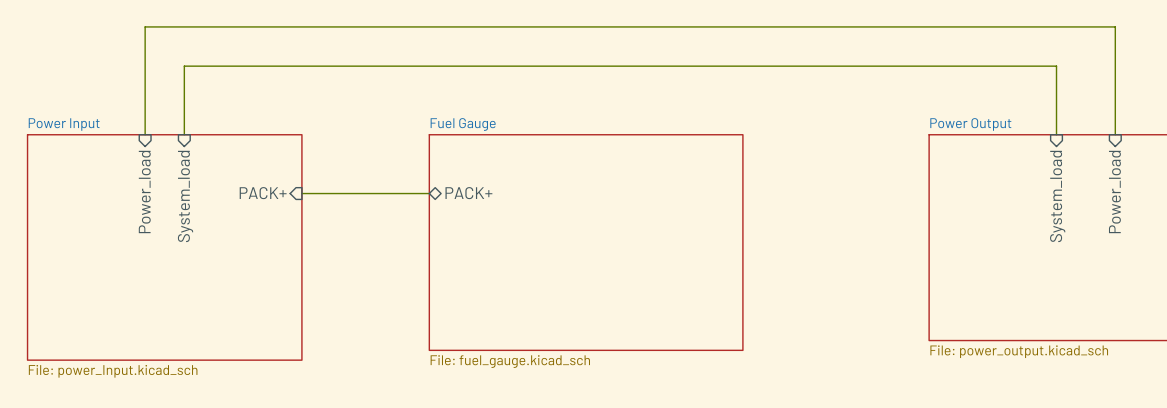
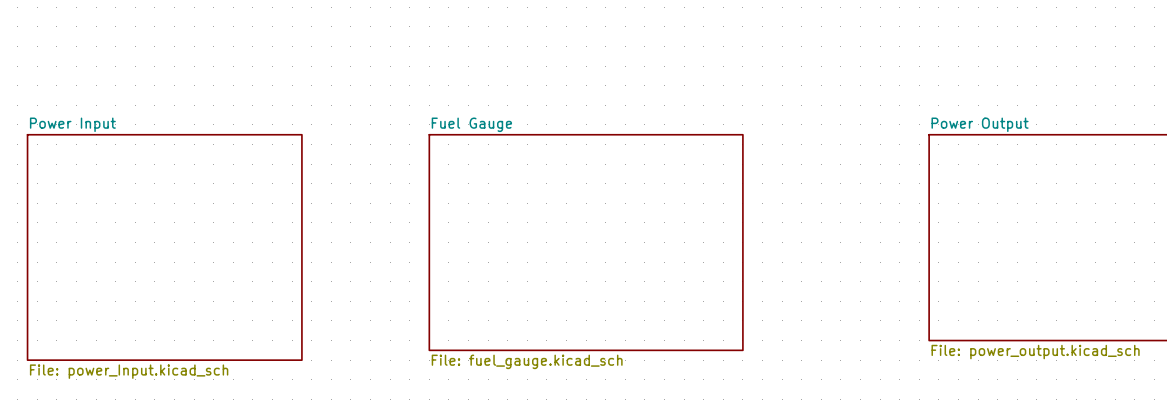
wire: (145, 134) (145, 26) (1115, 26) (1115, 134) -> none
wire: (184, 134) (184, 66) (1056, 66) (1056, 134) -> none
sheet pin: Power_load (144, 191) -> none
sheet pin: Power_load (1114, 191) -> none
sheet pin: PACK+ (263, 193) -> none
wire: (301, 193) (429, 193) -> none
sheet pin: PACK+ (468, 193) -> none
sheet pin: System_load (185, 196) -> none
sheet pin: System_load (1057, 196) -> none

